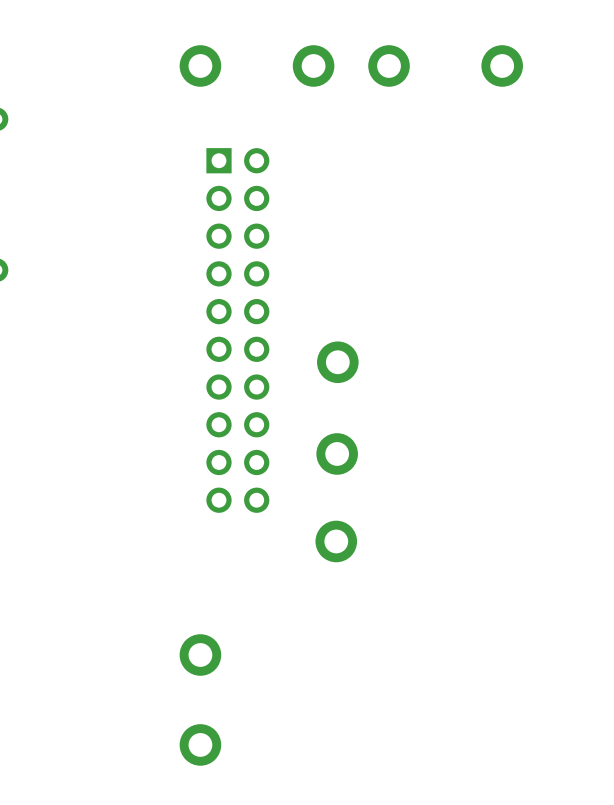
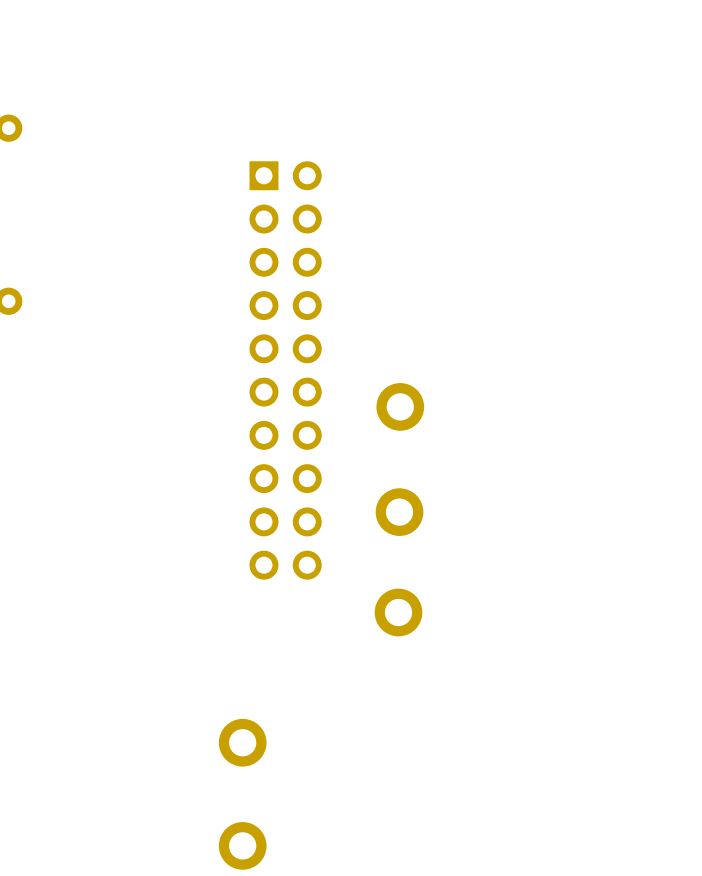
part: (200, 65) -> none
part: (313, 65) -> none
part: (389, 65) -> none
part: (502, 65) -> none

